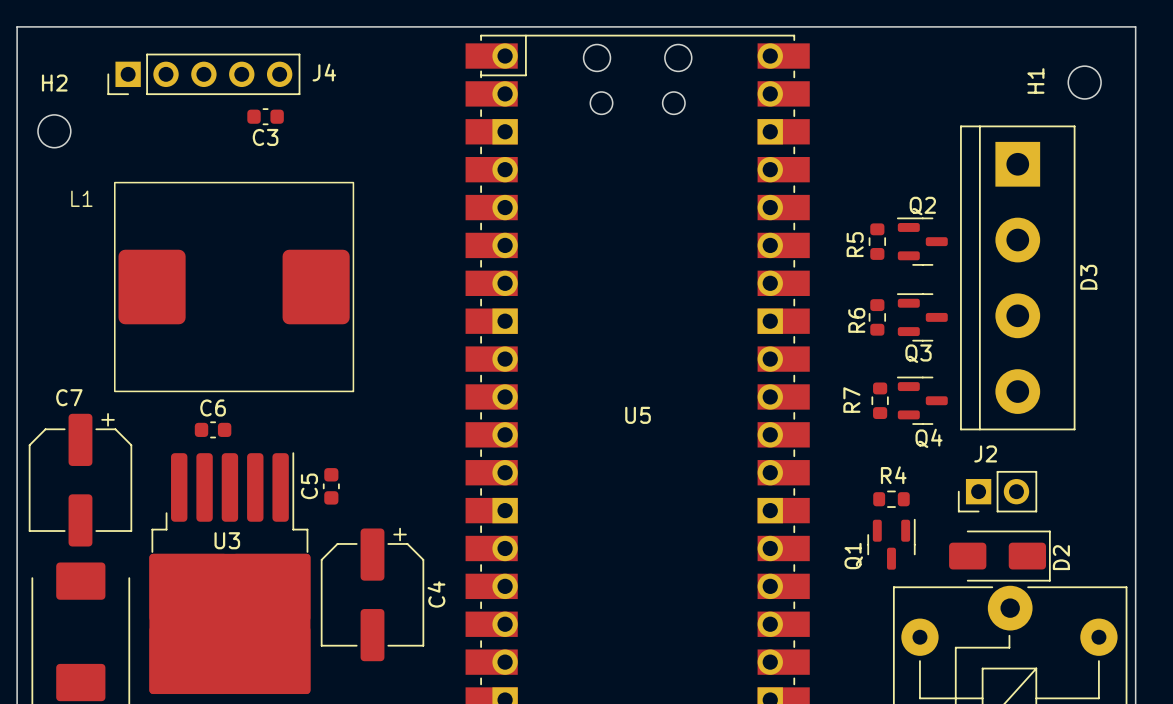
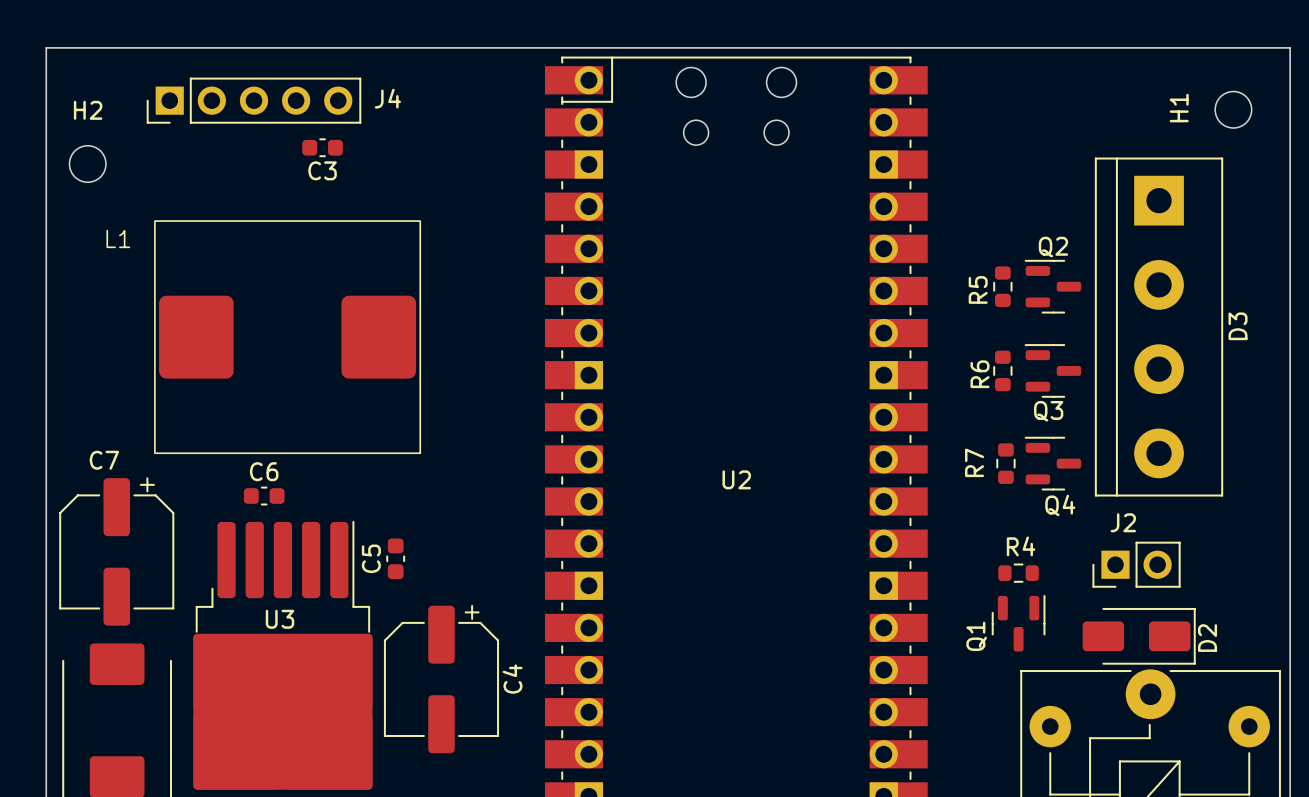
U5 name: U5 (638, 415) -> U2 (736, 479)

